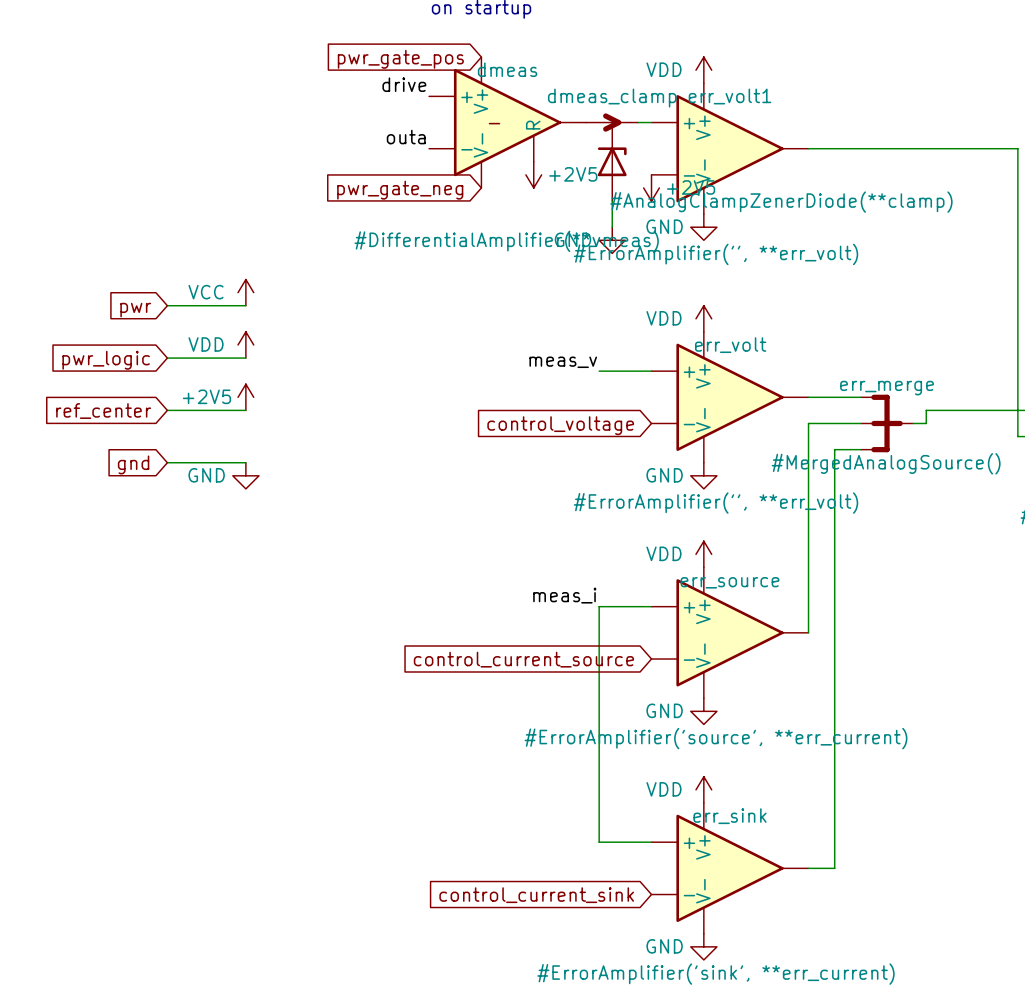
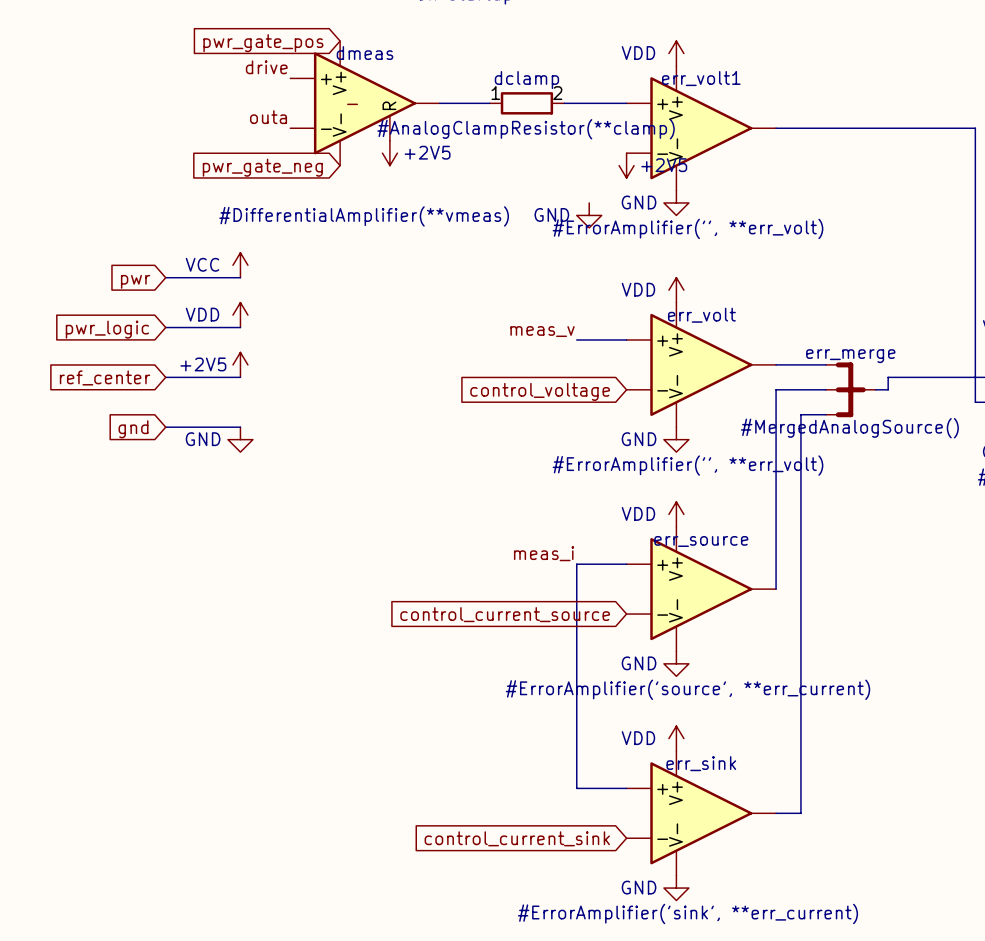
global label position: pwr_gate_pos (400, 59) -> pwr_gate_pos (263, 43)
label position: drive (404, 84) -> drive (266, 67)
dmeas position: (507, 122) -> (365, 103)
dclamp: none -> #AnalogClampResistor(**clamp) (526, 103)
label position: outa (406, 137) -> outa (268, 117)
dmeas_clamp: #AnalogClampZenerDiode(**clamp) (612, 157) -> none
power symbol position: +2V5 (533, 174) -> +2V5 (389, 153)
global label position: pwr_gate_neg (400, 190) -> pwr_gate_neg (262, 167)
wire: (612, 201) (612, 227) -> none

